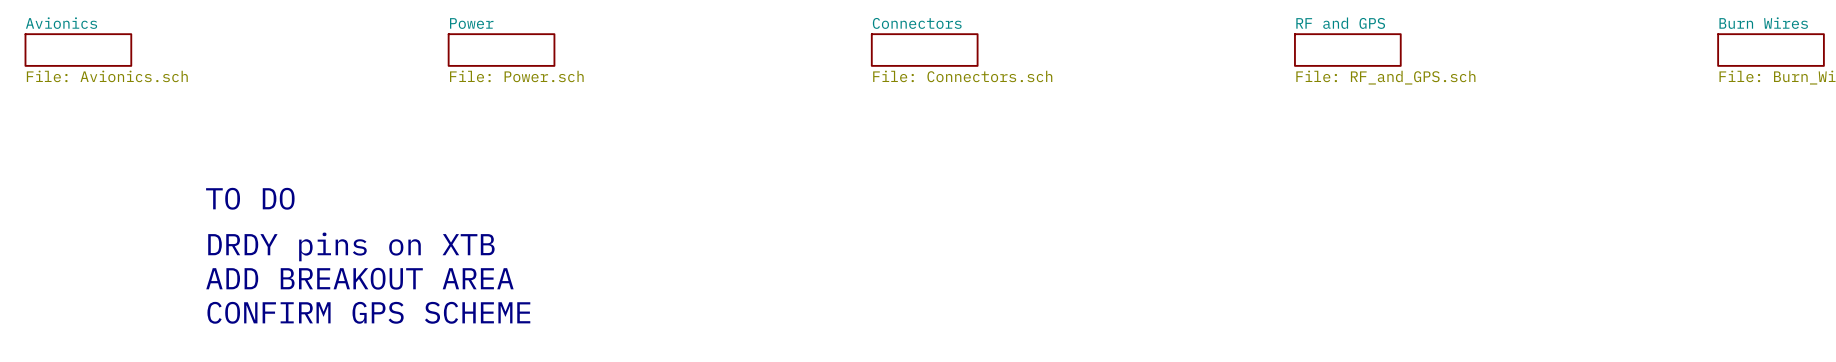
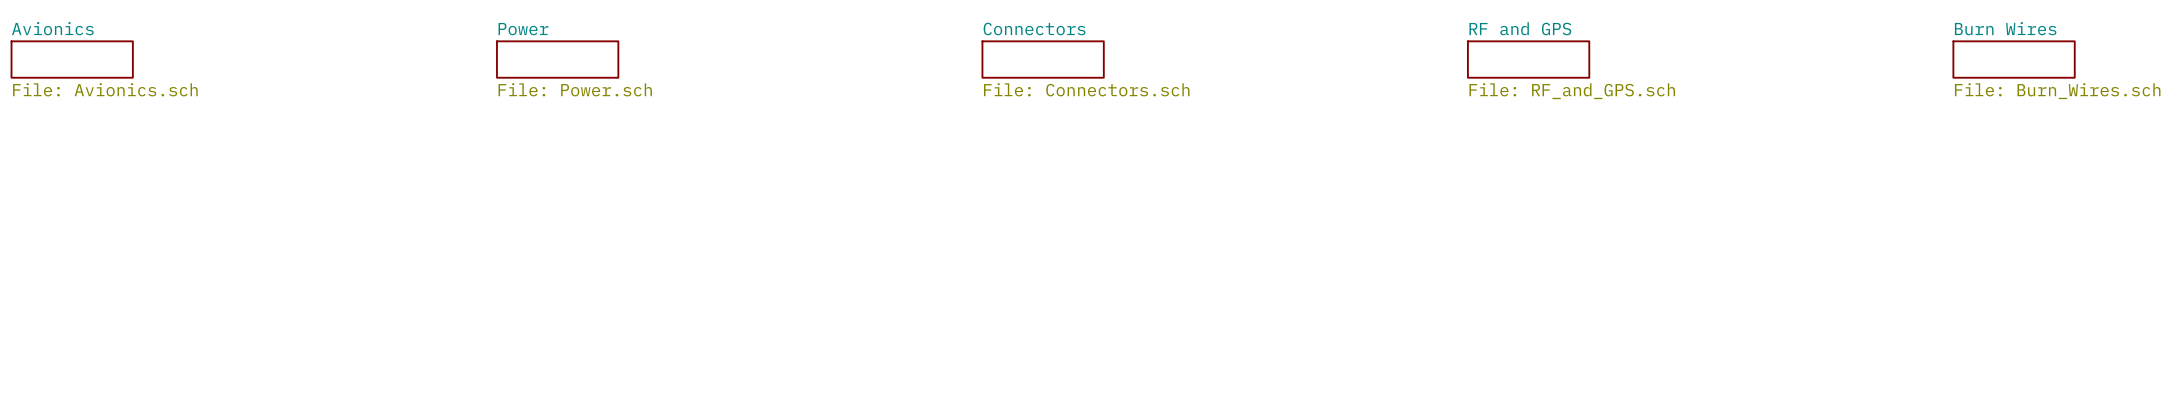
text: TO DO (250, 198) -> none
text: DRDY pins on XTB (351, 246) -> none
text: ADD BREAKOUT AREA (359, 278) -> none
text: CONFIRM GPS SCHEME (368, 312) -> none

